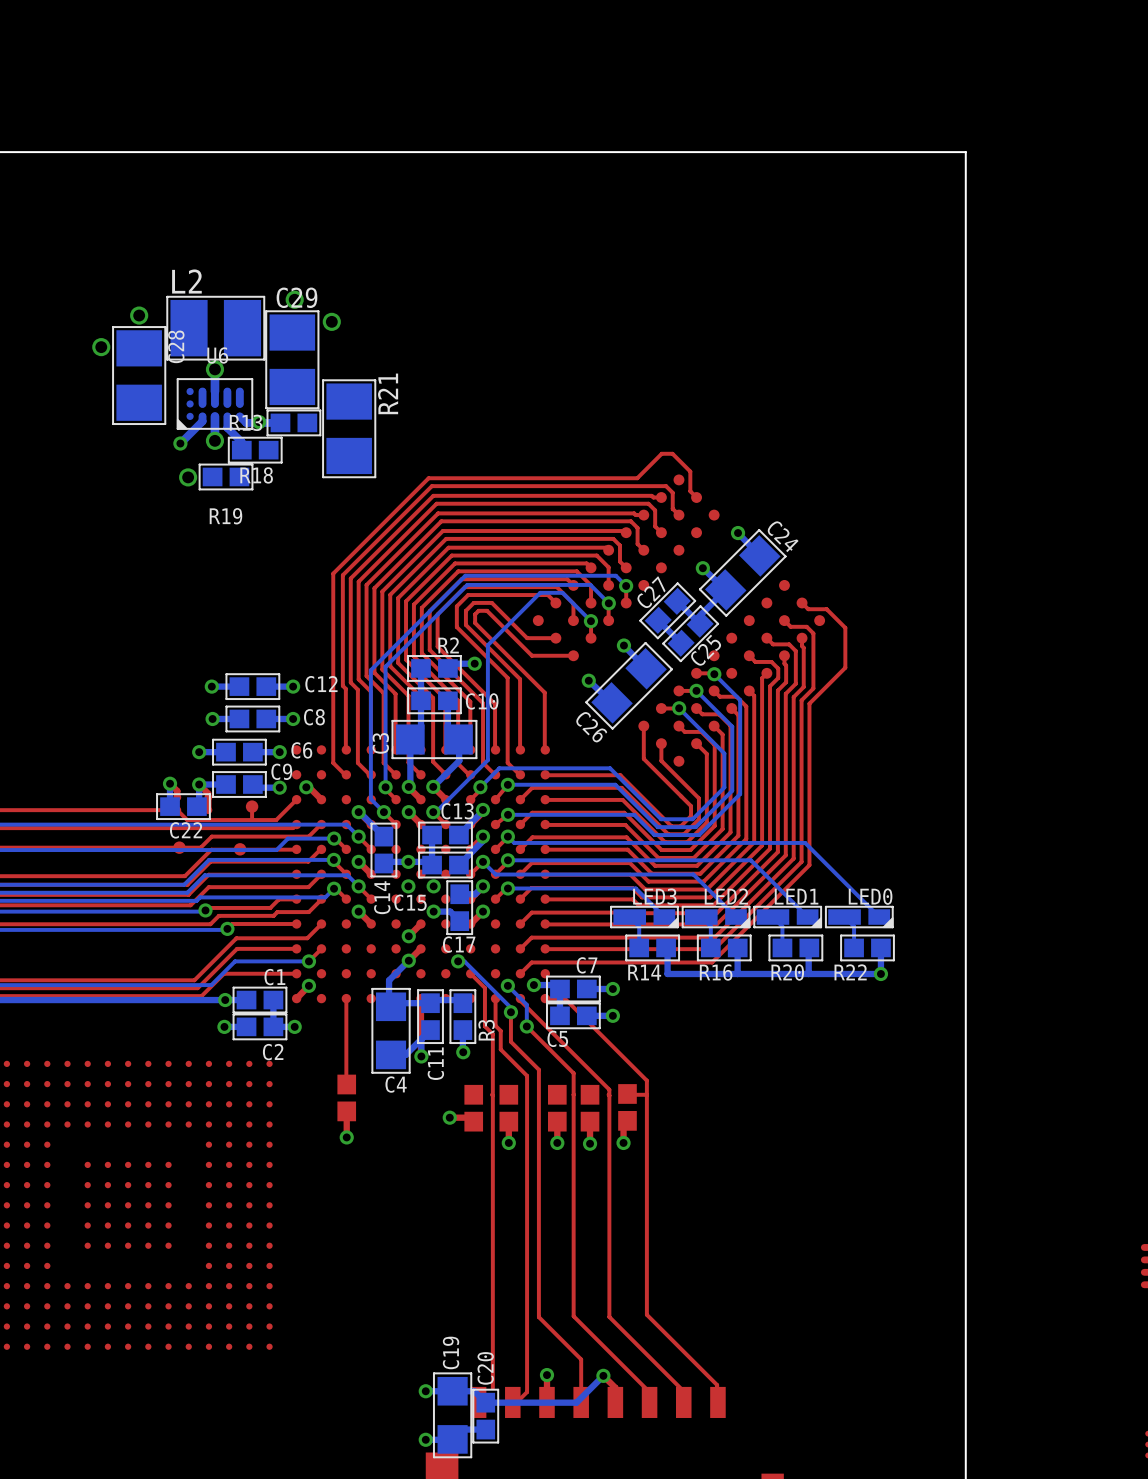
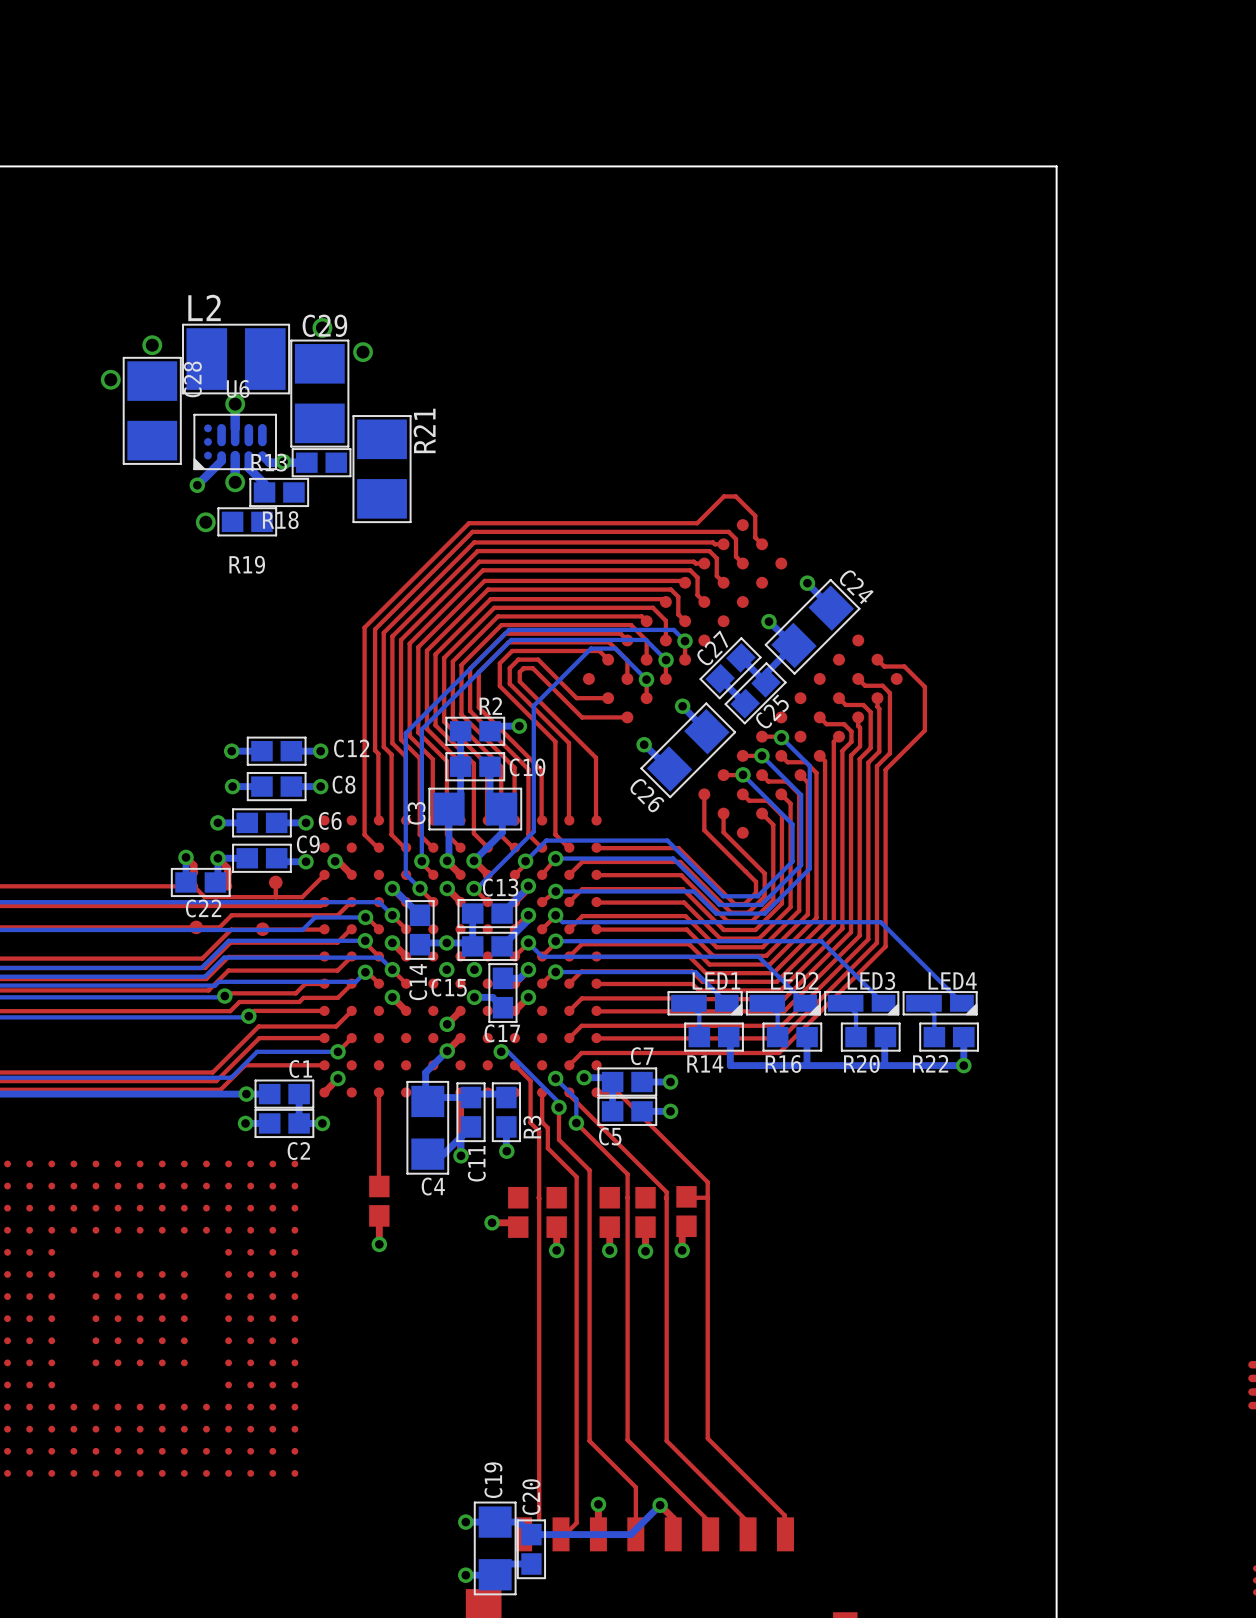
LED3 name: LED3 (654, 896) -> LED1 (716, 980)
LED1 name: LED1 (796, 896) -> LED3 (871, 980)
LED0 name: LED0 (870, 896) -> LED4 (952, 980)

